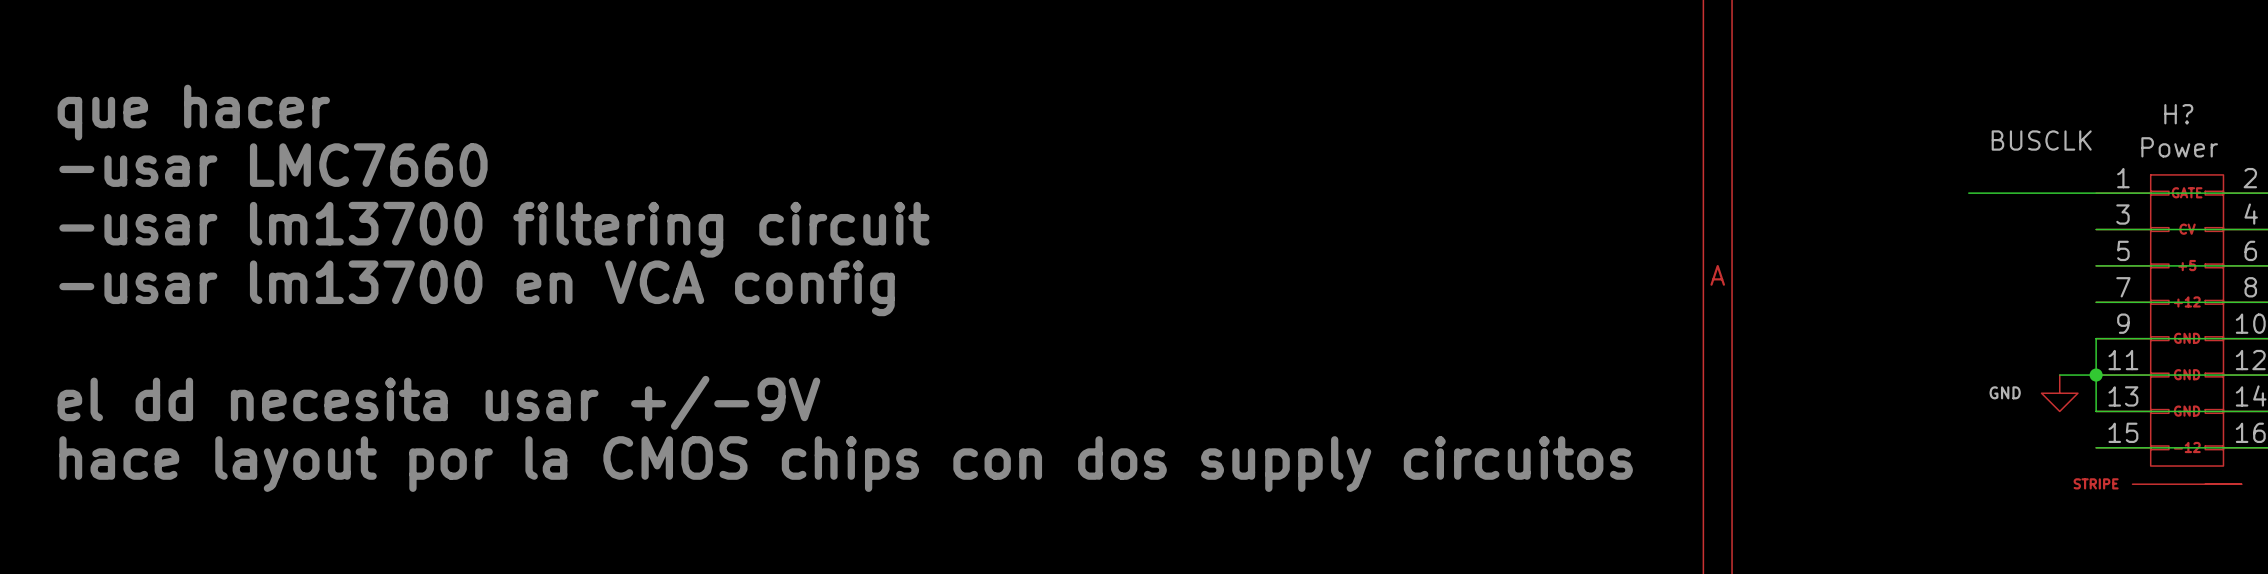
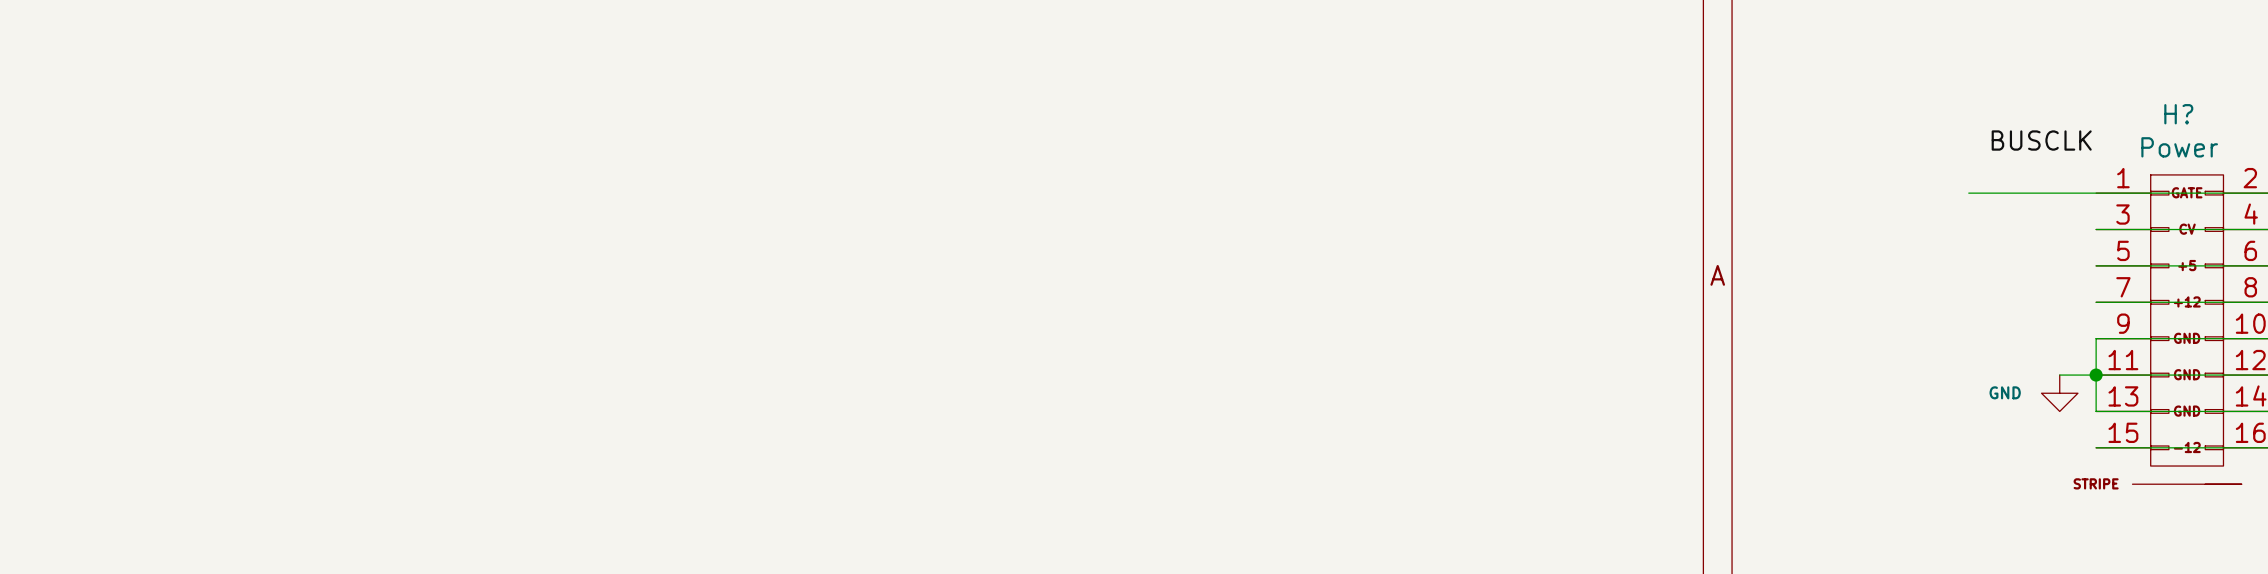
text: que hacer (193, 112) -> none
text: -usar LMC7660 (273, 165) -> none
text: -usar lm13700 filtering circuit (494, 229) -> none
text: -usar lm13700 en VCA config (477, 288) -> none
text: el dd necesita usar +/-9V (438, 402) -> none
text: hace layout por la CMOS chips con dos supply circuitos (846, 464) -> none

